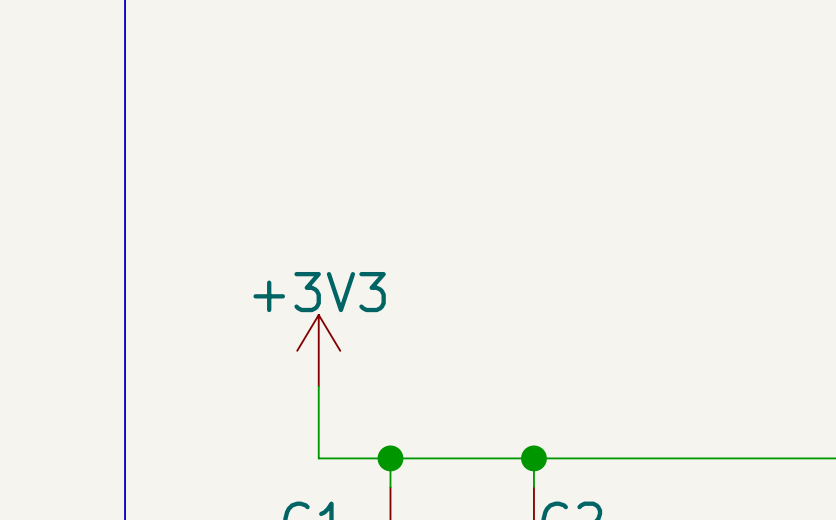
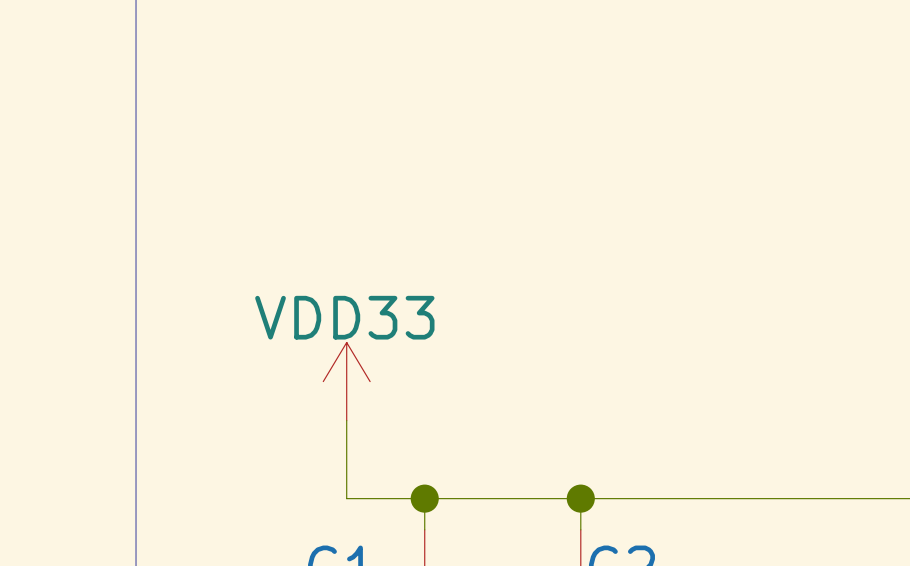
power symbol: +3V3 (318, 350) -> VDD33 (346, 381)

